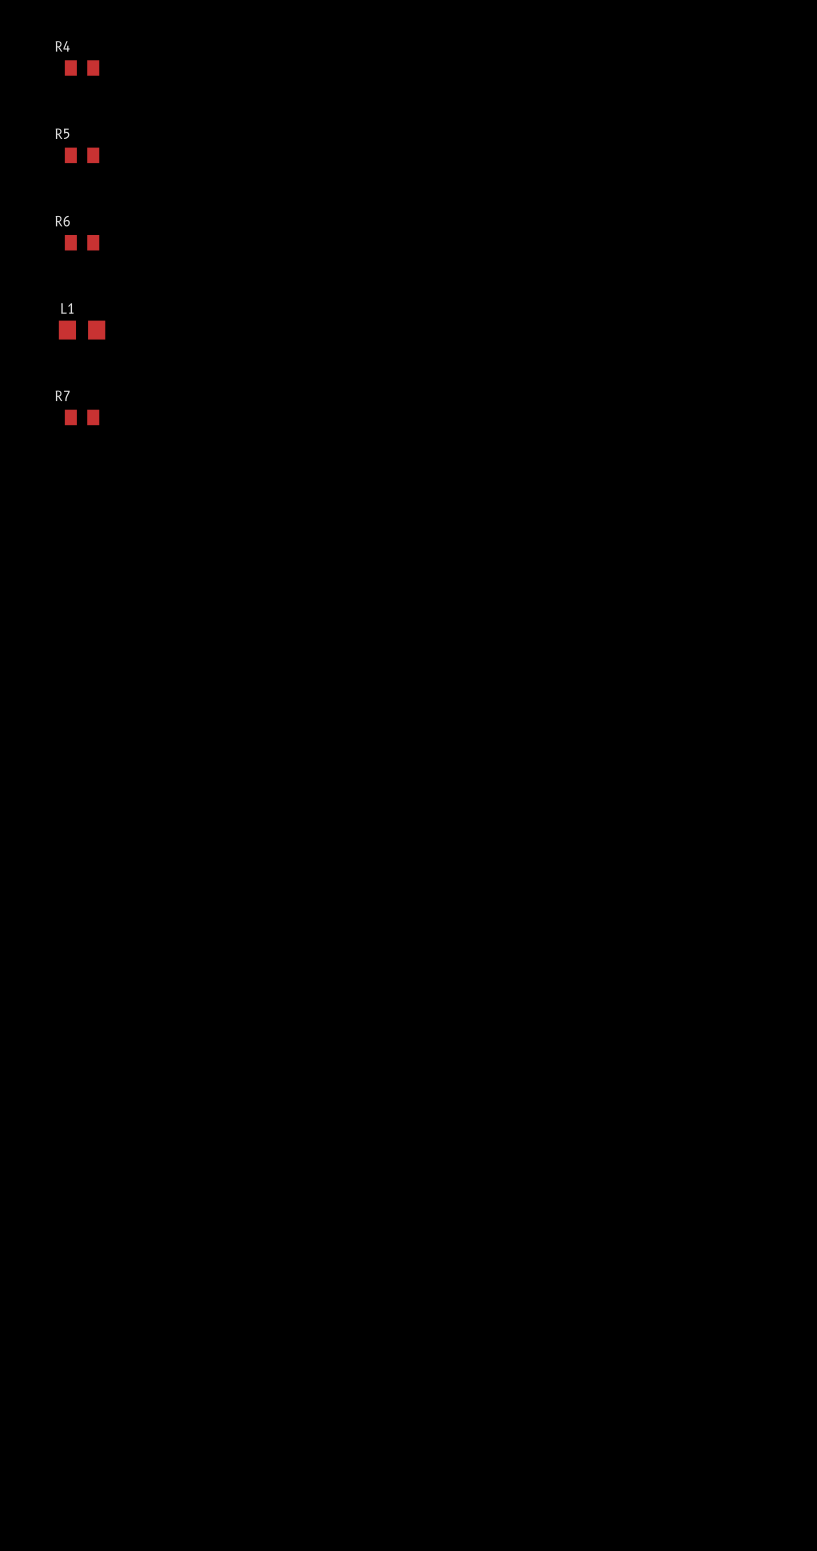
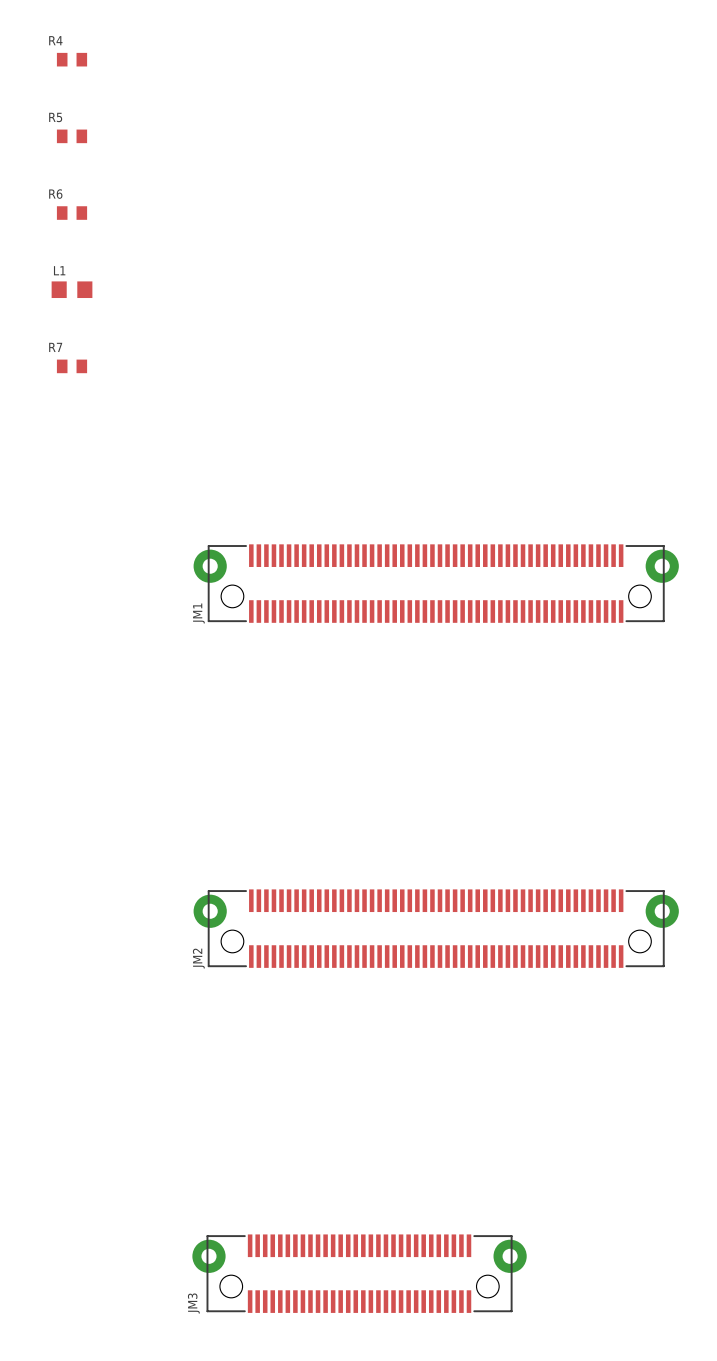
JM1: none -> (436, 583)
JM2: none -> (436, 928)
JM3: none -> (359, 1273)

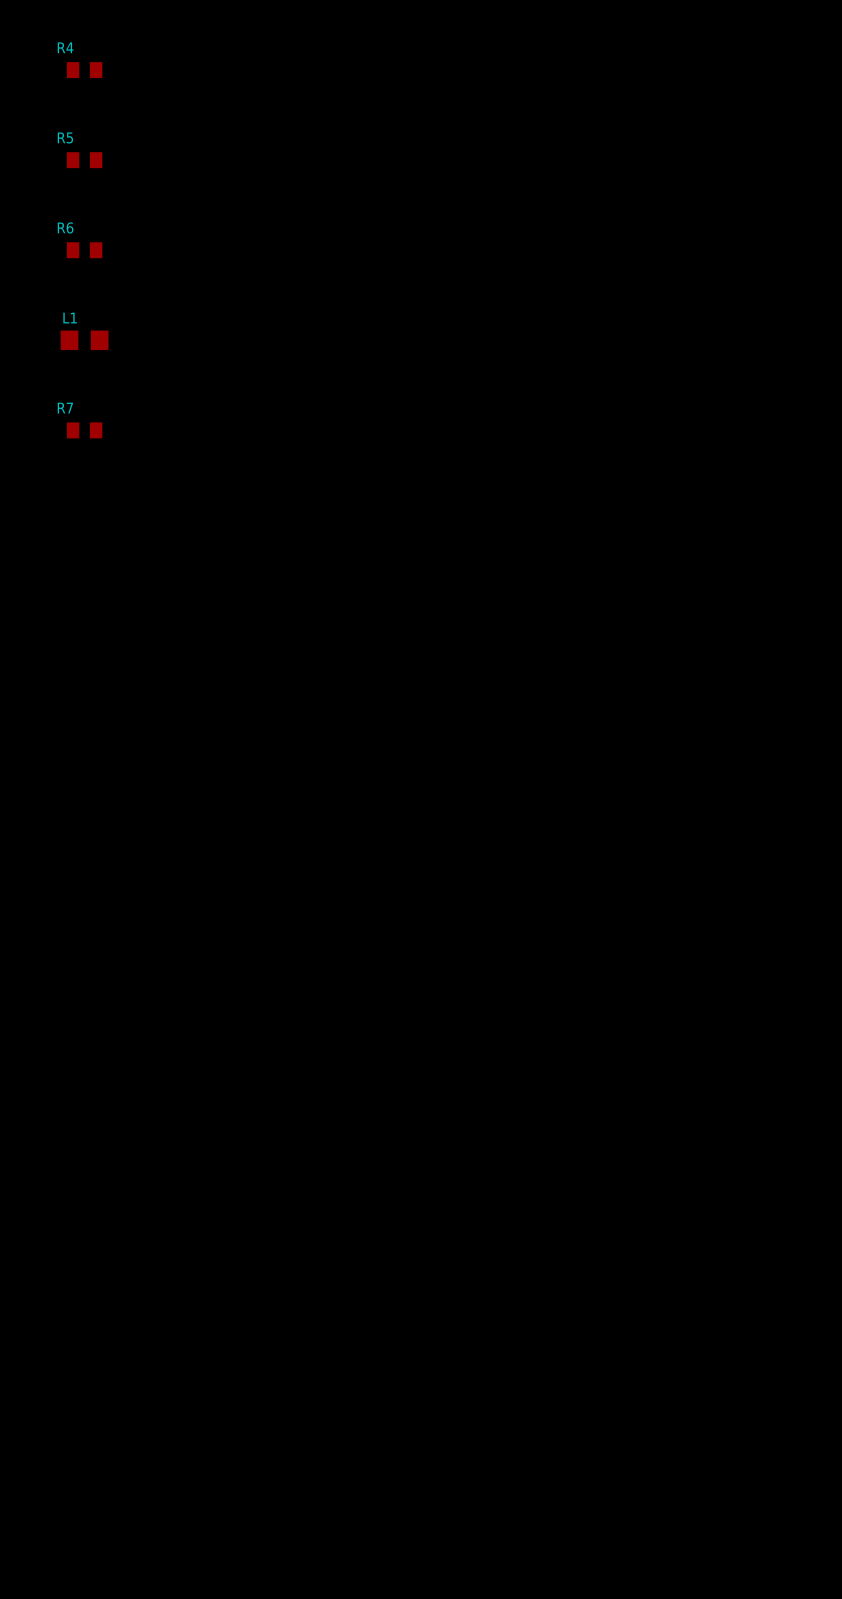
JM1: (436, 583) -> none
JM2: (436, 928) -> none
JM3: (359, 1273) -> none

